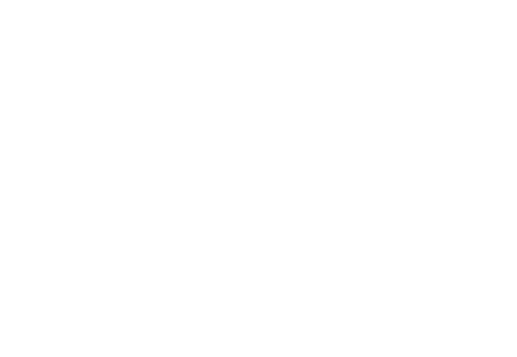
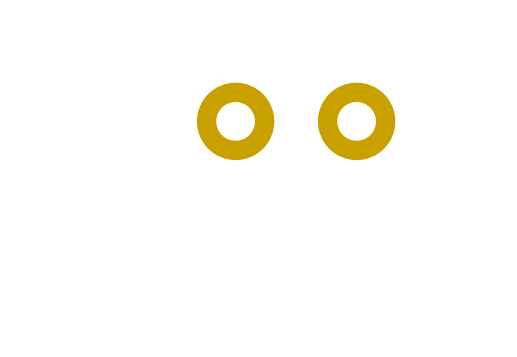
part: none -> (296, 121)

